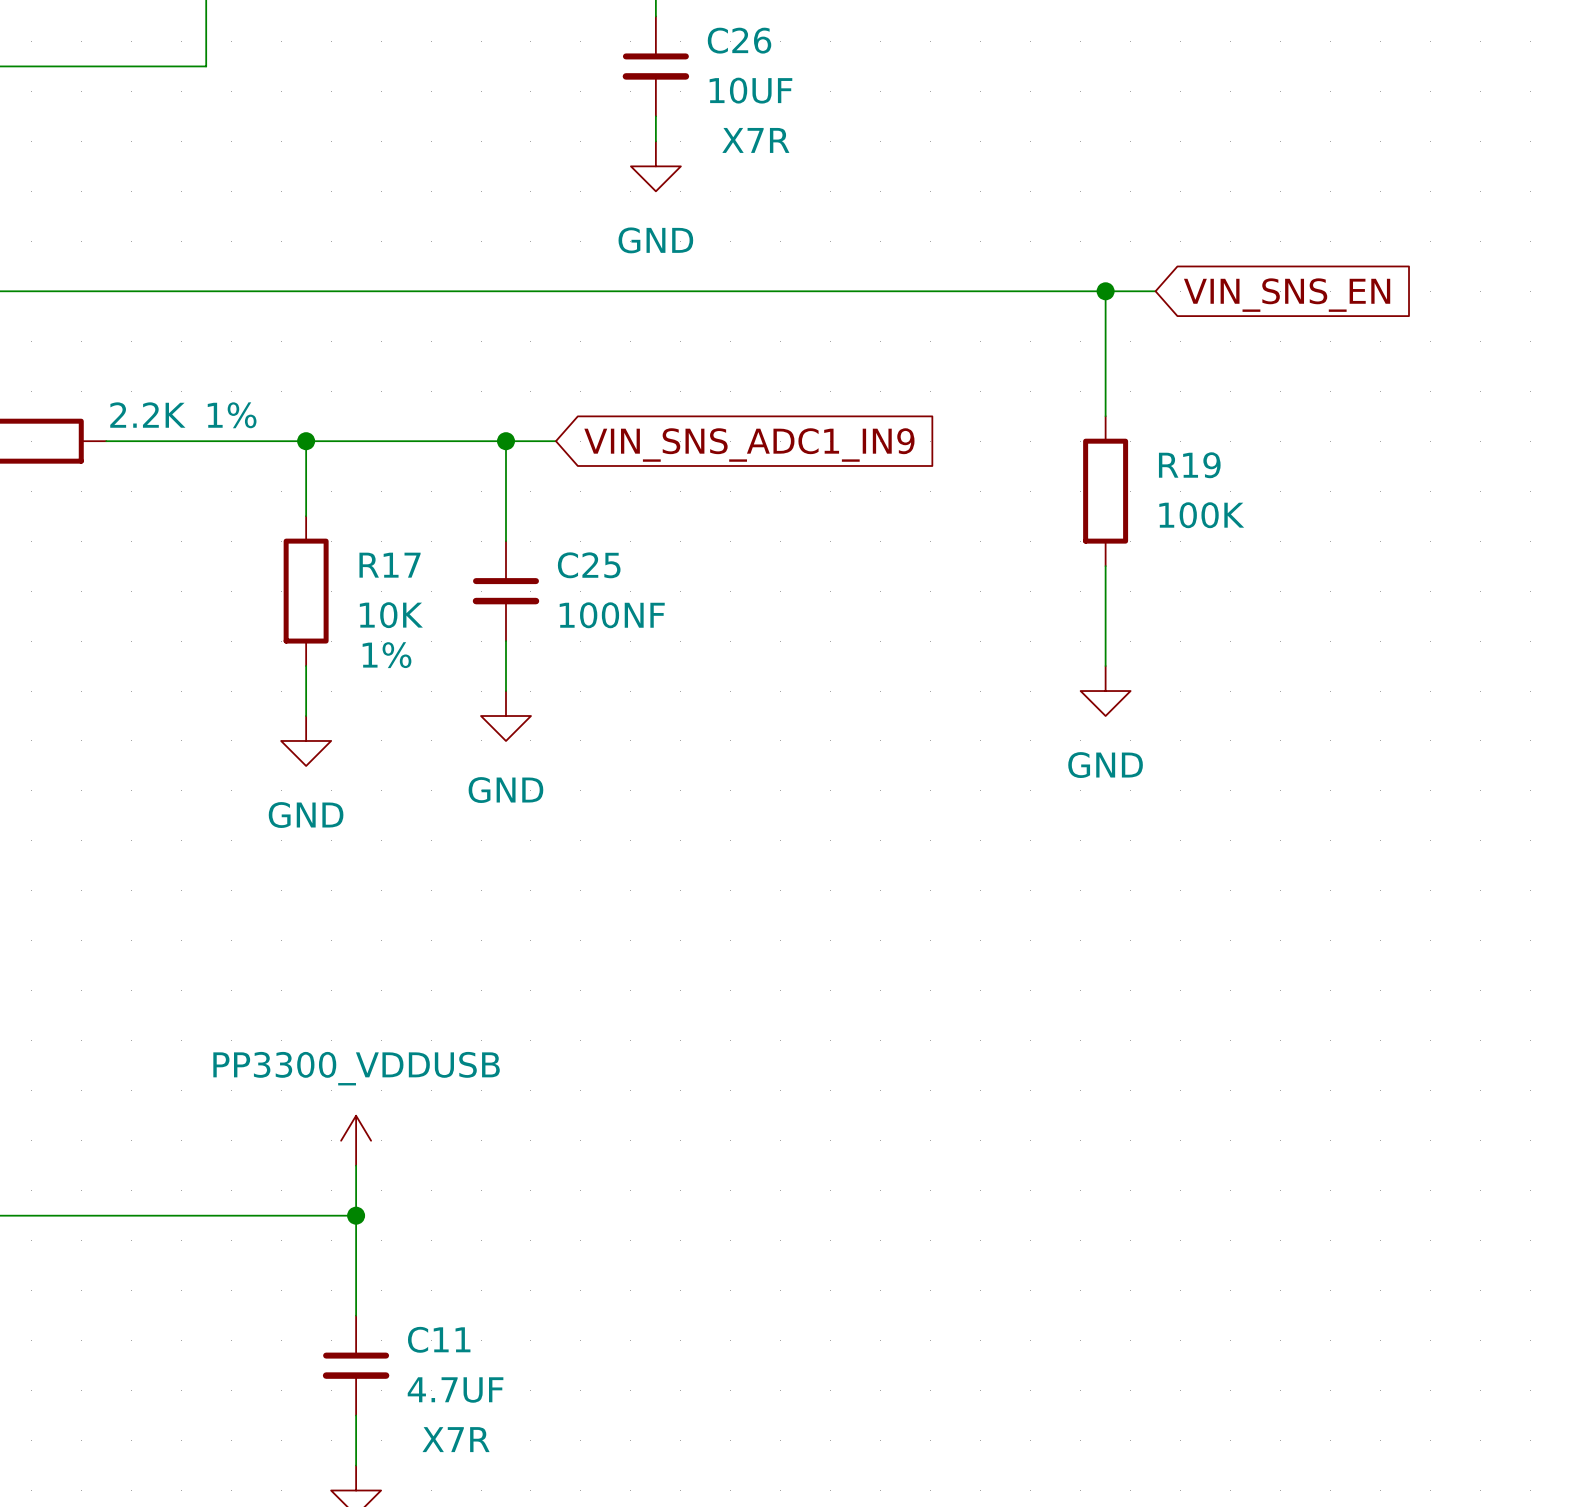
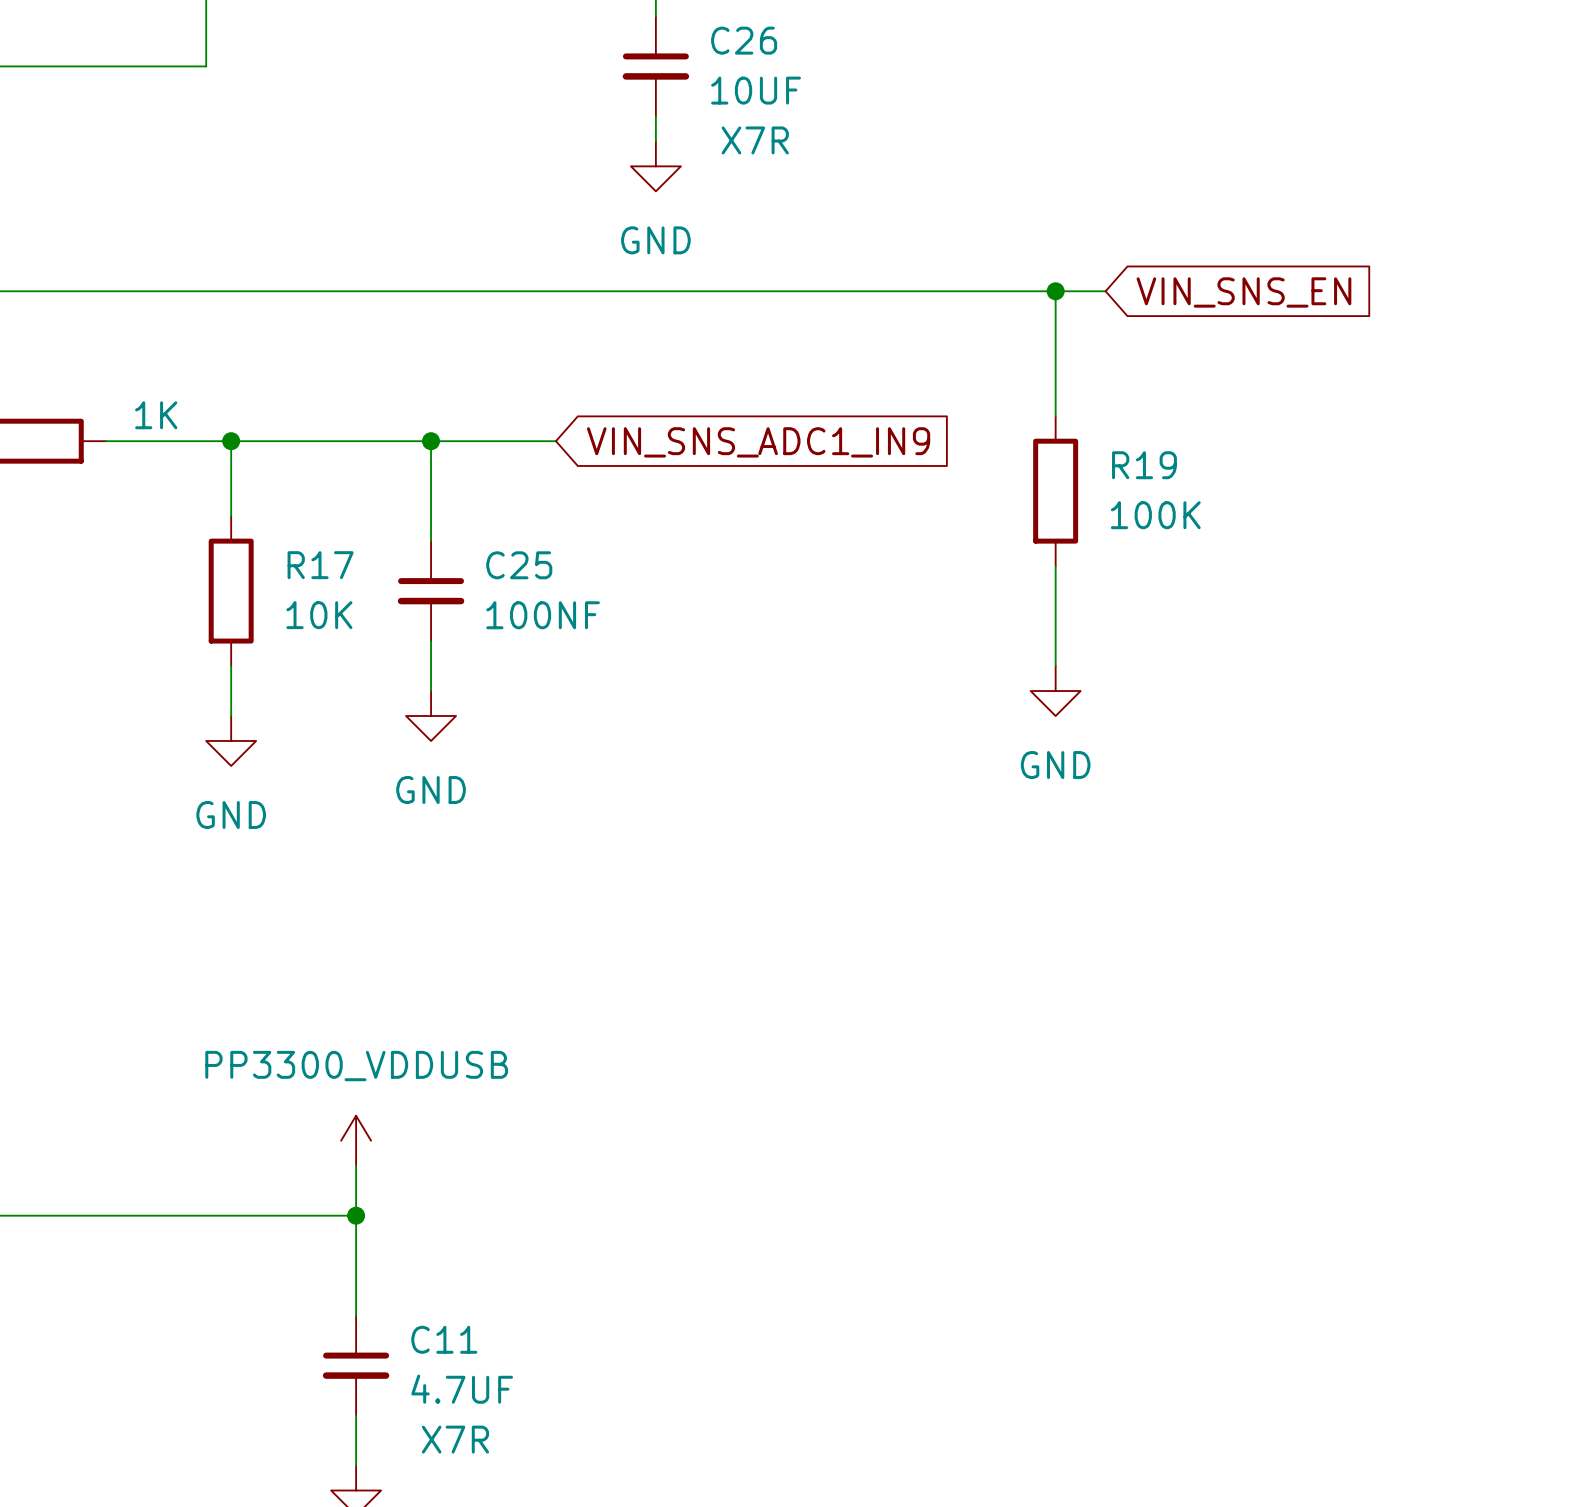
wire: none -> (1055, 291) (1055, 416)
junction position: (1105, 291) -> (1055, 291)
wire: (1155, 291) (1105, 291) (1105, 416) -> none
global label position: VIN_SNS_EN (1287, 295) -> VIN_SNS_EN (1243, 292)
part value: 2.2K (147, 415) -> 1K (156, 415)
part text: 1% (232, 415) -> none
junction: none -> (231, 441)
wire: (306, 441) (306, 516) -> (231, 441) (231, 516)
junction: (306, 441) -> none
junction: none -> (431, 441)
wire: (506, 441) (506, 541) -> (431, 441) (431, 541)
junction: (506, 441) -> none
R19 position: (1105, 491) -> (1055, 491)
wire: (1105, 566) (1105, 666) -> (1055, 566) (1055, 666)
R17 position: (306, 591) -> (231, 591)
C25 position: (506, 591) -> (431, 591)
wire: (506, 641) (506, 691) -> (431, 641) (431, 691)
R17 text: 1% (387, 655) -> none
wire: (306, 666) (306, 716) -> (231, 666) (231, 716)
power symbol position: GND (1105, 691) -> GND (1055, 691)
power symbol: none -> GND (431, 716)
power symbol: GND (506, 716) -> none
power symbol: none -> GND (231, 740)
power symbol: GND (306, 740) -> none

